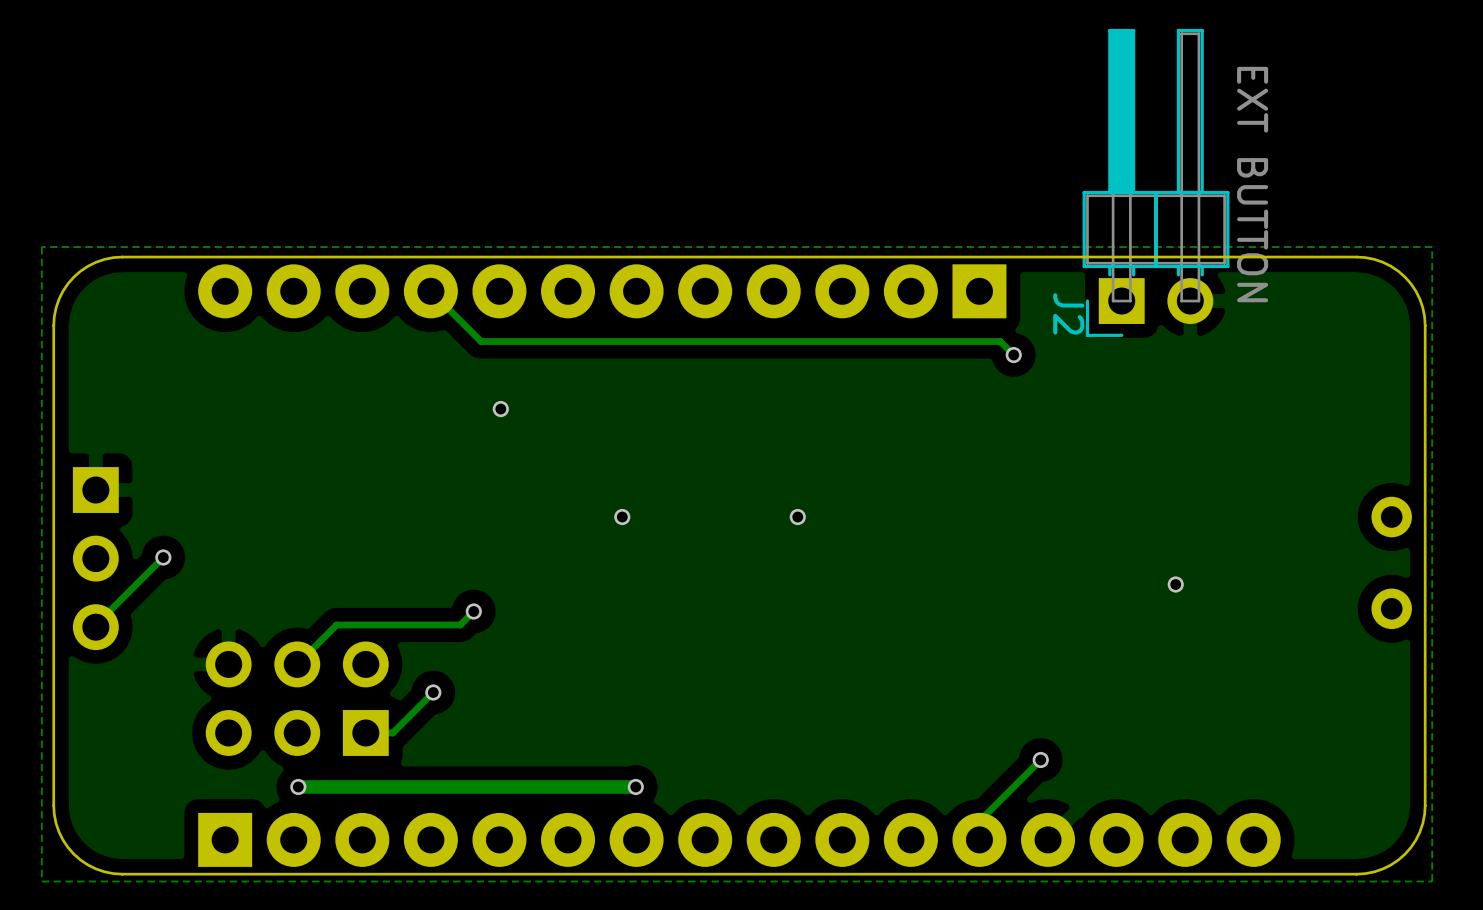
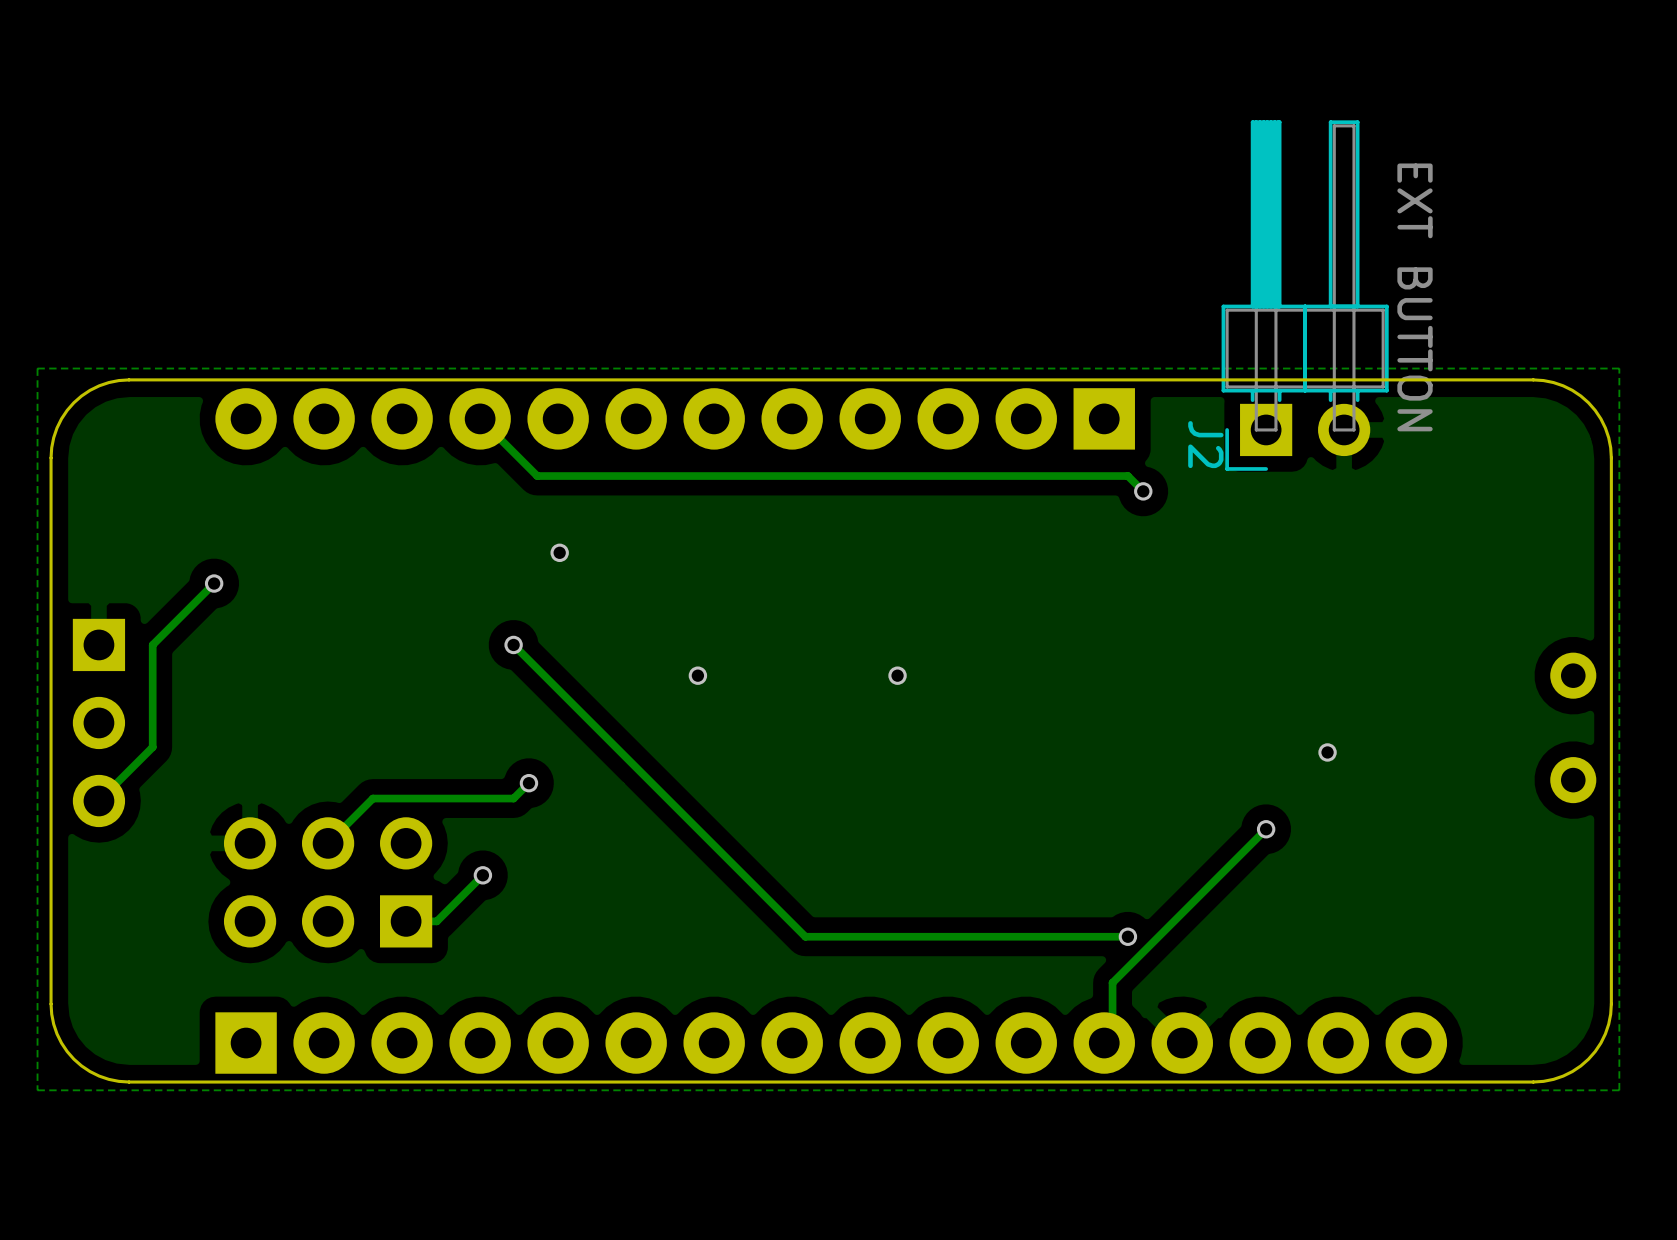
track: none -> (214, 583) (152, 644) (152, 747) (98, 800)
track: none -> (513, 644) (805, 936) (1127, 936)
via: none -> (513, 644)
track: (163, 557) (95, 625) -> none
via position: (163, 557) -> (214, 583)
via: none -> (1266, 829)
track: (1040, 759) (979, 821) (979, 839) -> (1266, 829) (1112, 982) (1112, 1034) (1104, 1043)
via position: (1040, 759) -> (1127, 936)
via: (298, 786) -> none
track: (635, 786) (298, 786) -> none
via: (635, 786) -> none

